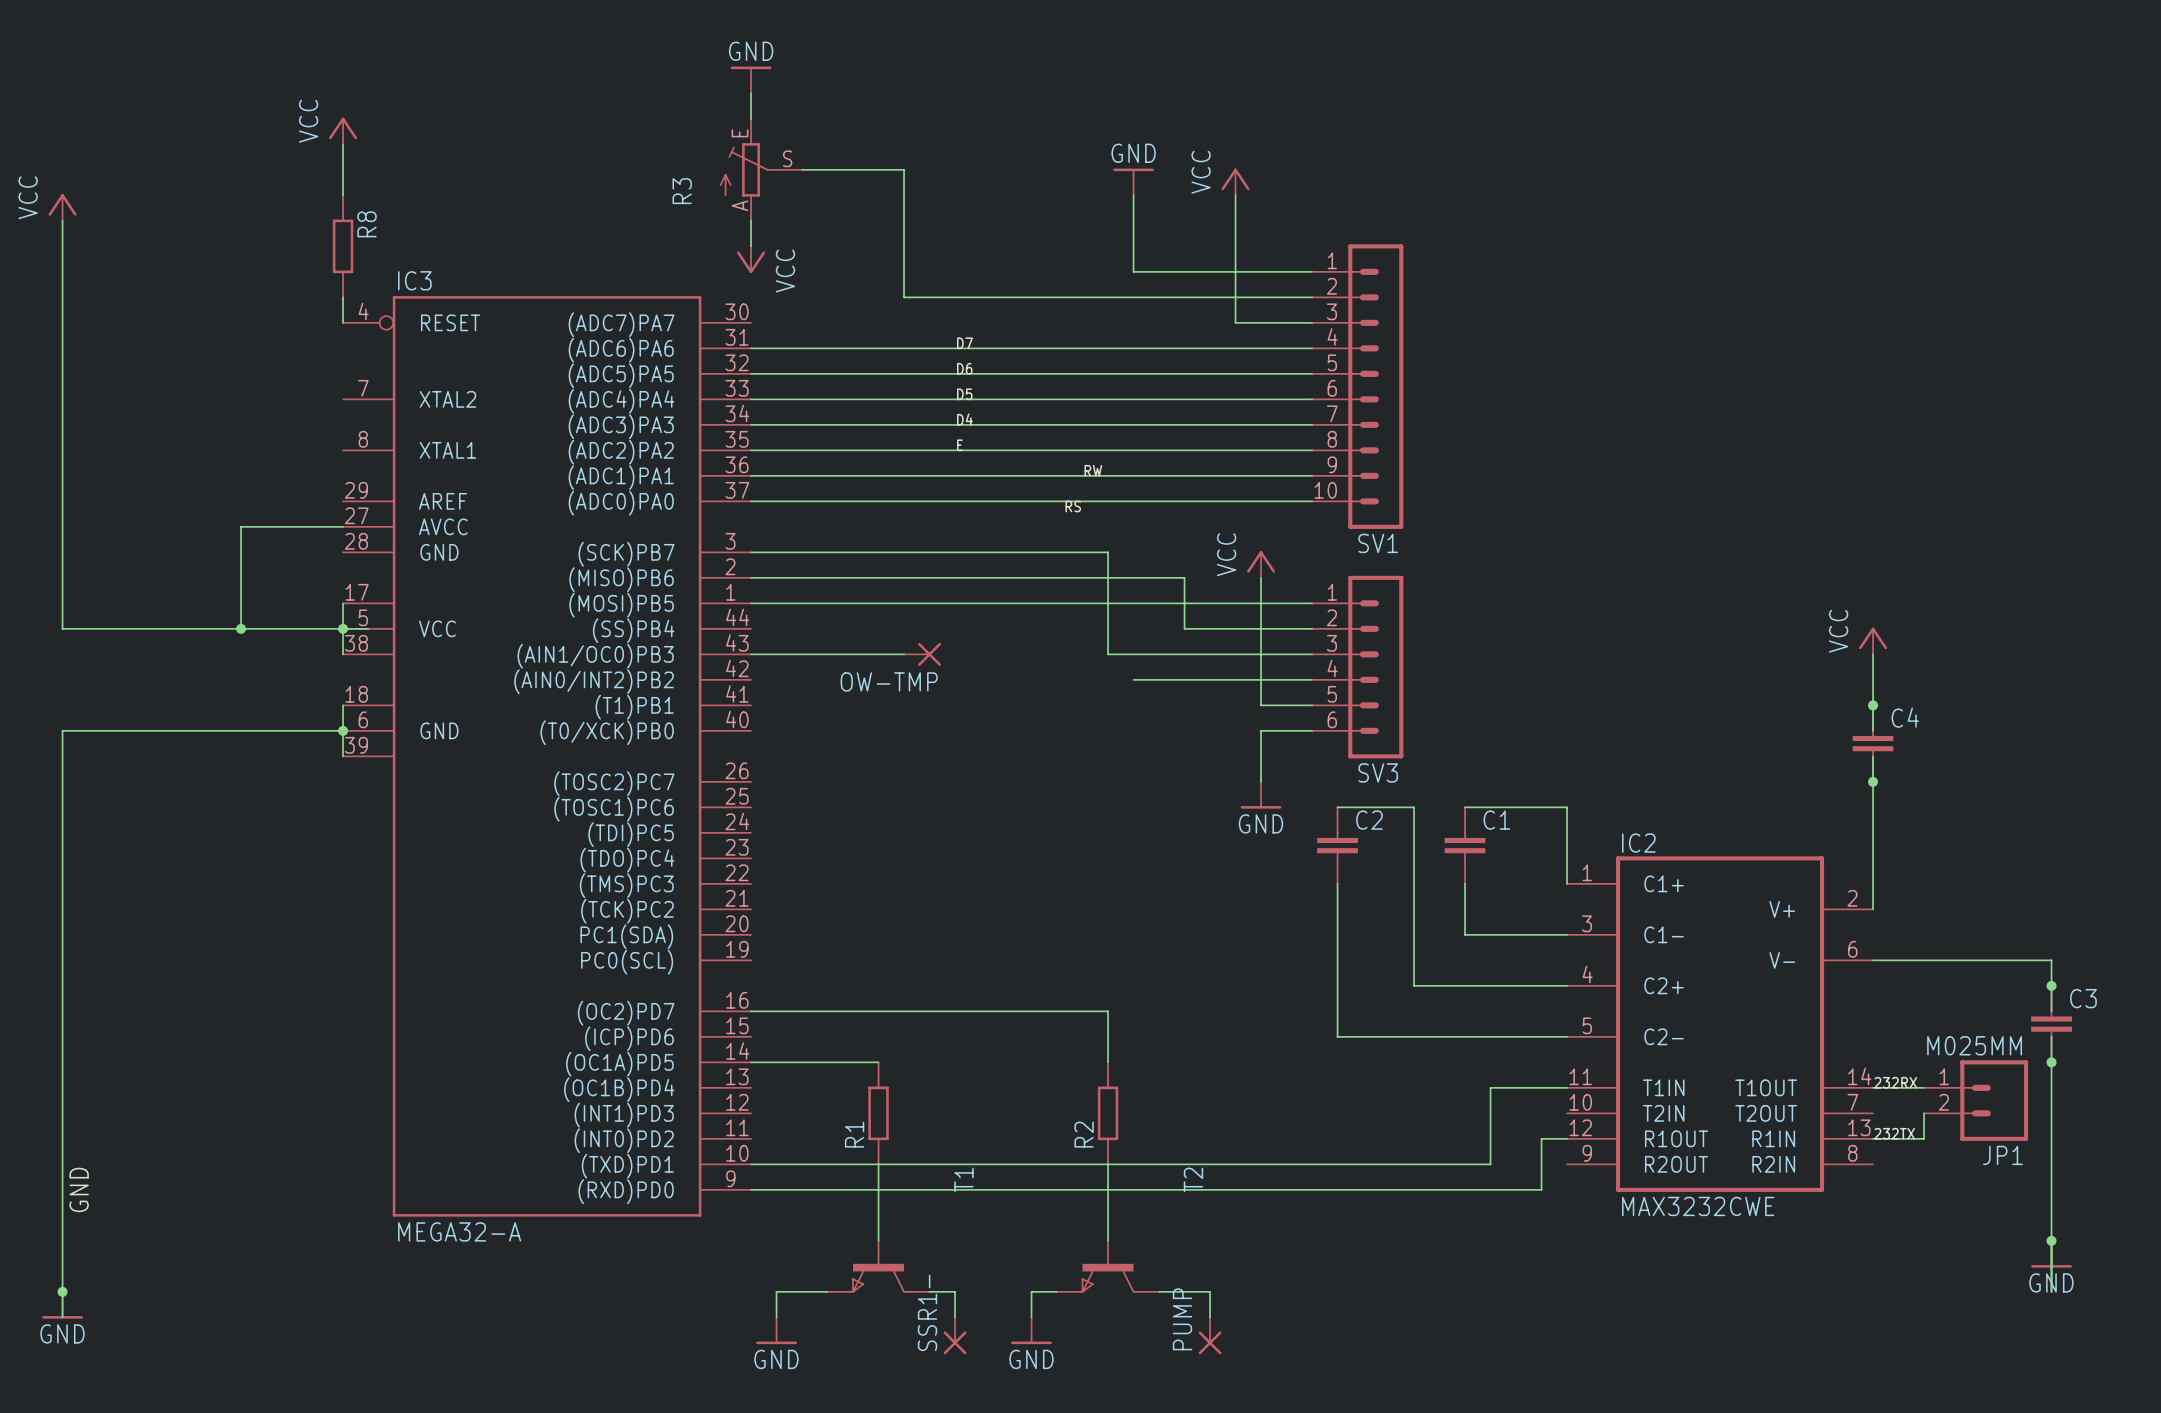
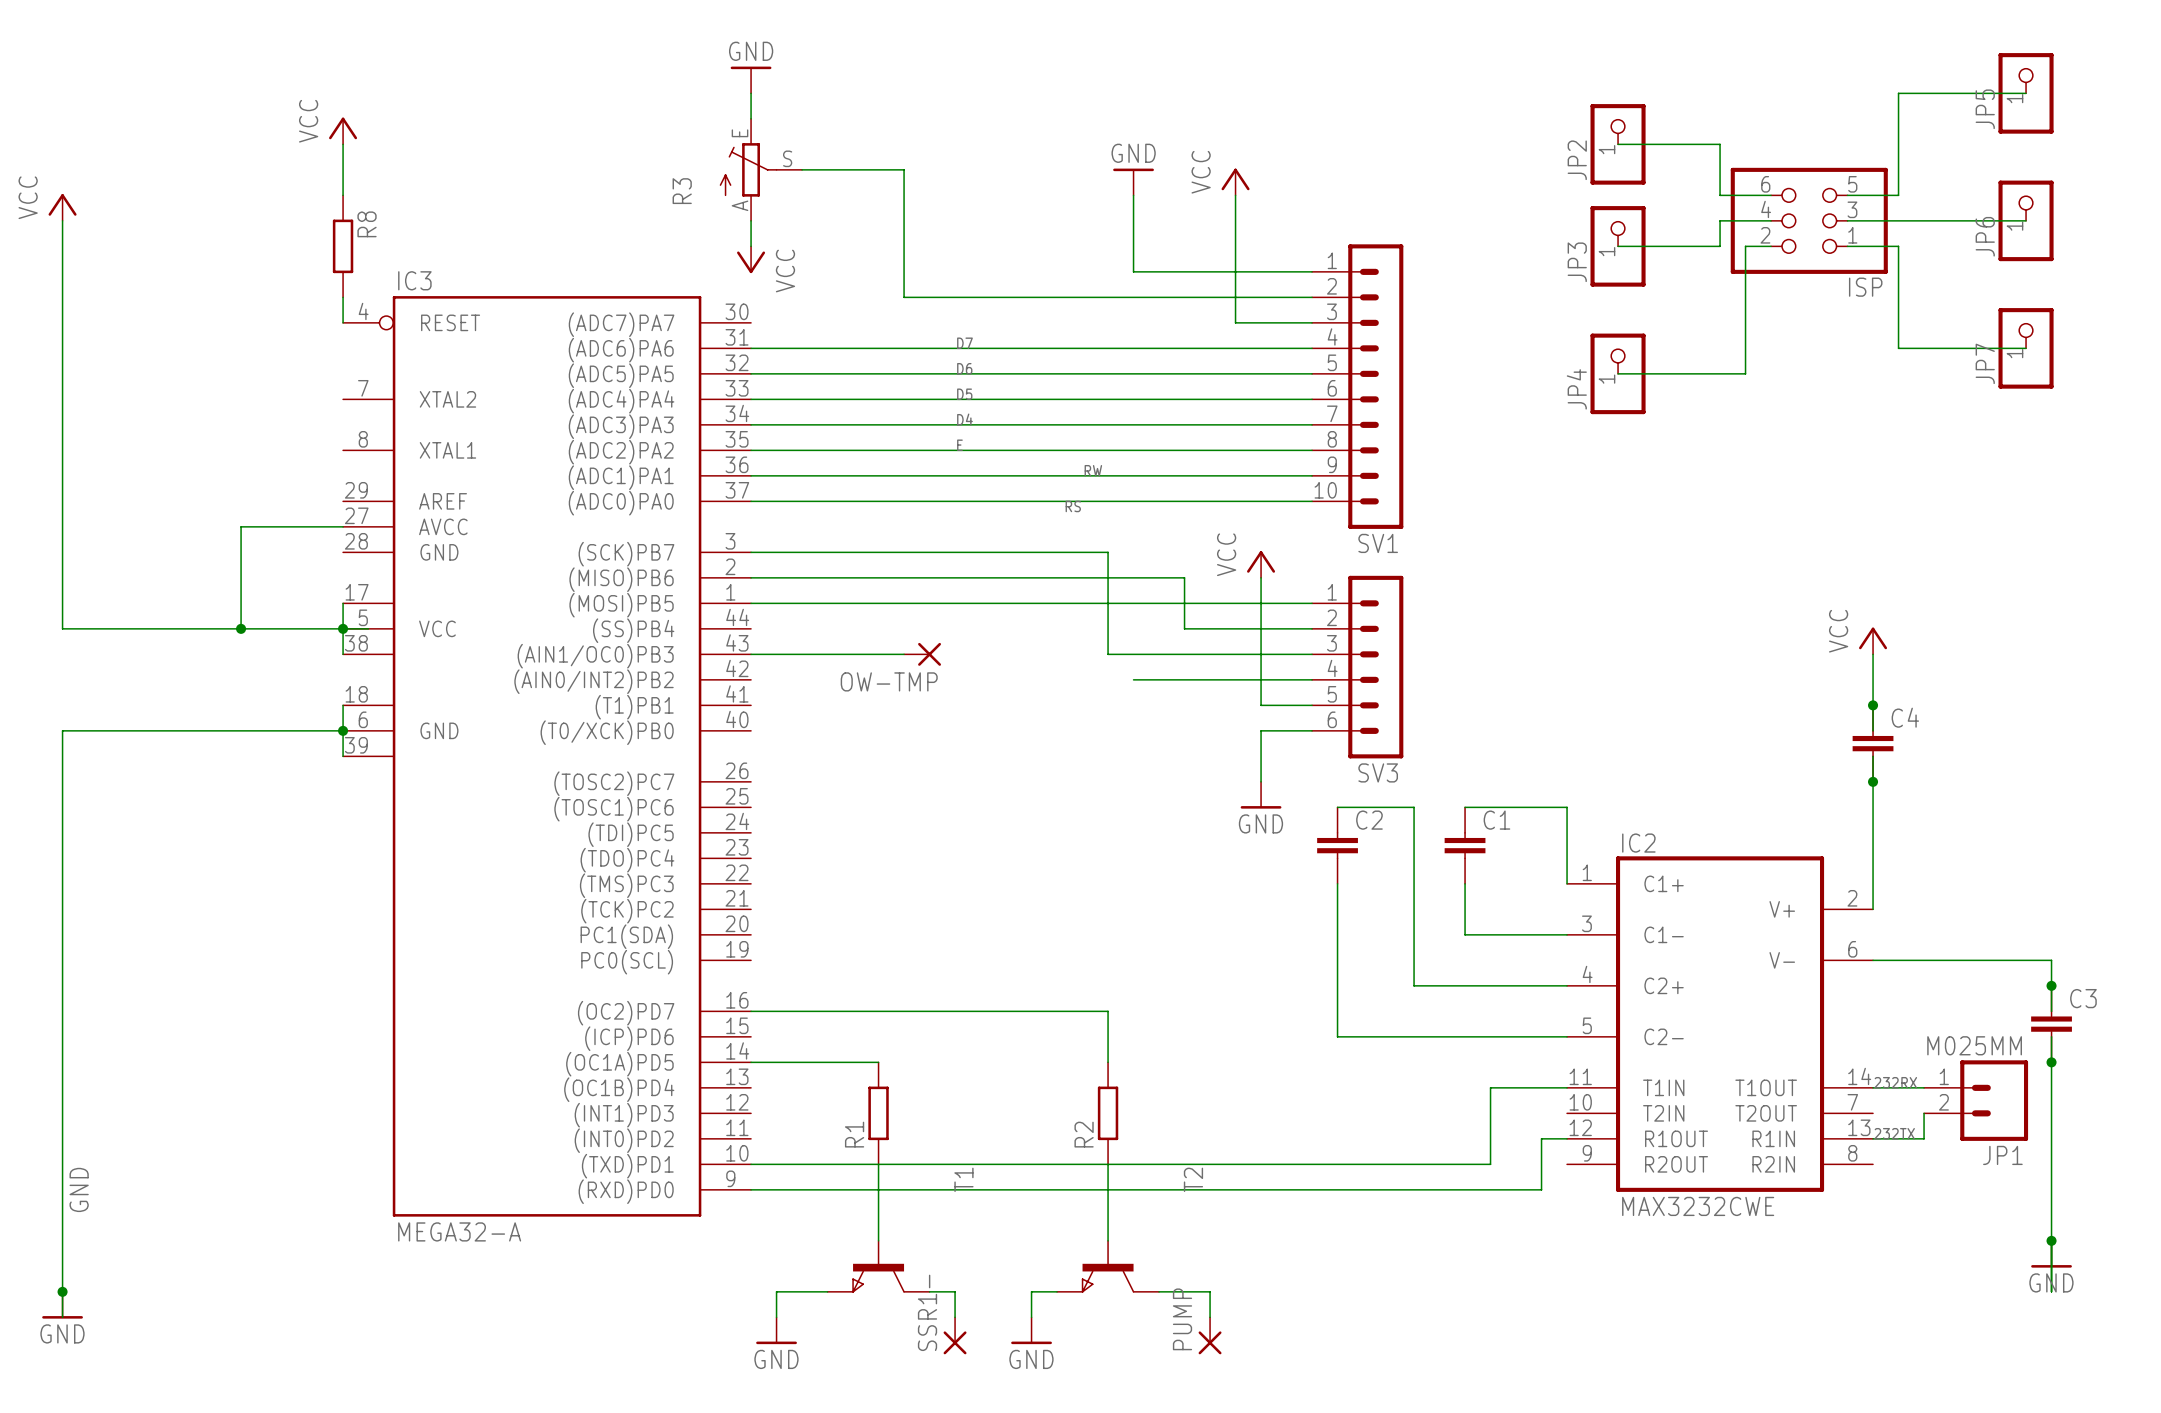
wire: none -> (2026, 93) (1898, 93) (1898, 195) (1847, 195)
JP5: none -> (2026, 93)
wire: none -> (1618, 144) (1720, 144) (1720, 195) (1771, 195)
JP2: none -> (1618, 144)
wire: none -> (1771, 220) (1720, 220) (1720, 246) (1618, 246)
ISP: none -> (1809, 220)
wire: none -> (1847, 220) (2026, 220)
JP6: none -> (2026, 220)
JP3: none -> (1618, 246)
wire: none -> (1771, 246) (1745, 246) (1745, 373) (1618, 373)
wire: none -> (1847, 246) (1898, 246) (1898, 348) (2026, 348)
JP7: none -> (2026, 348)
JP4: none -> (1618, 373)

